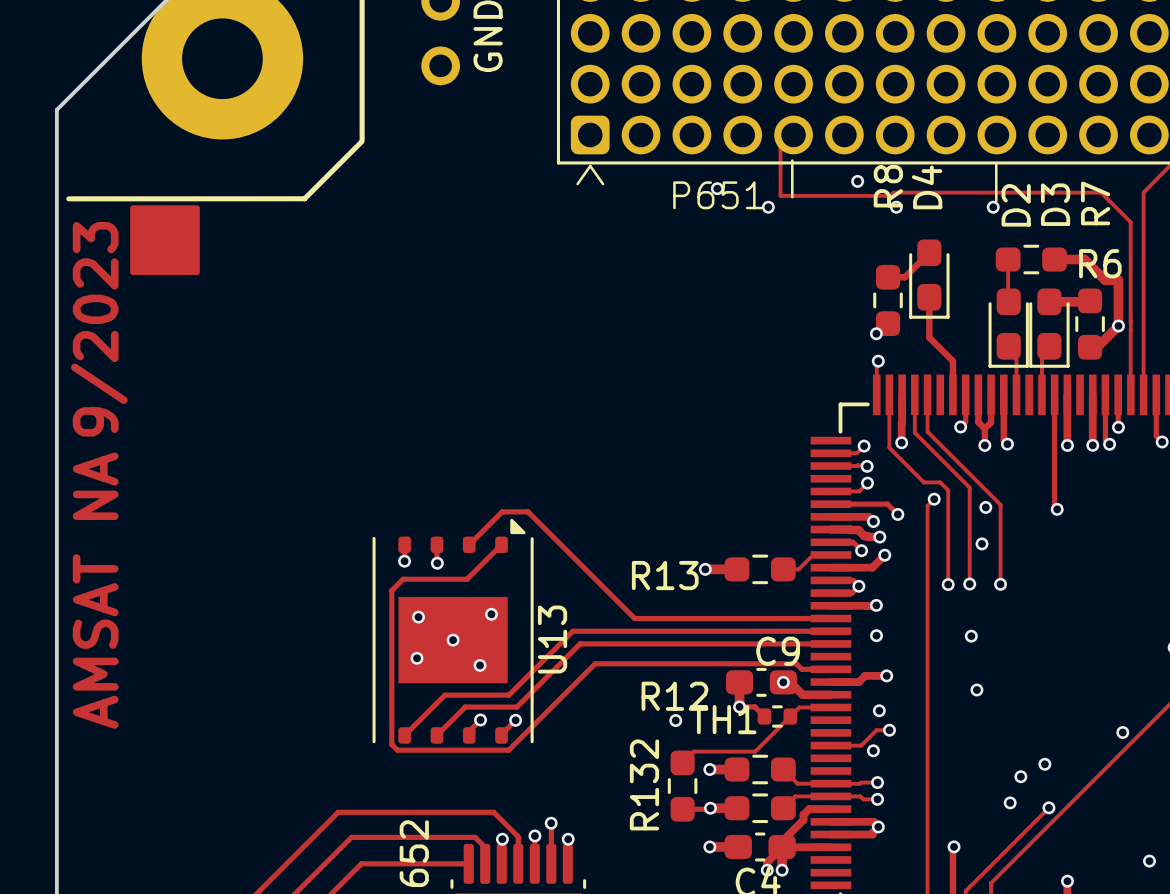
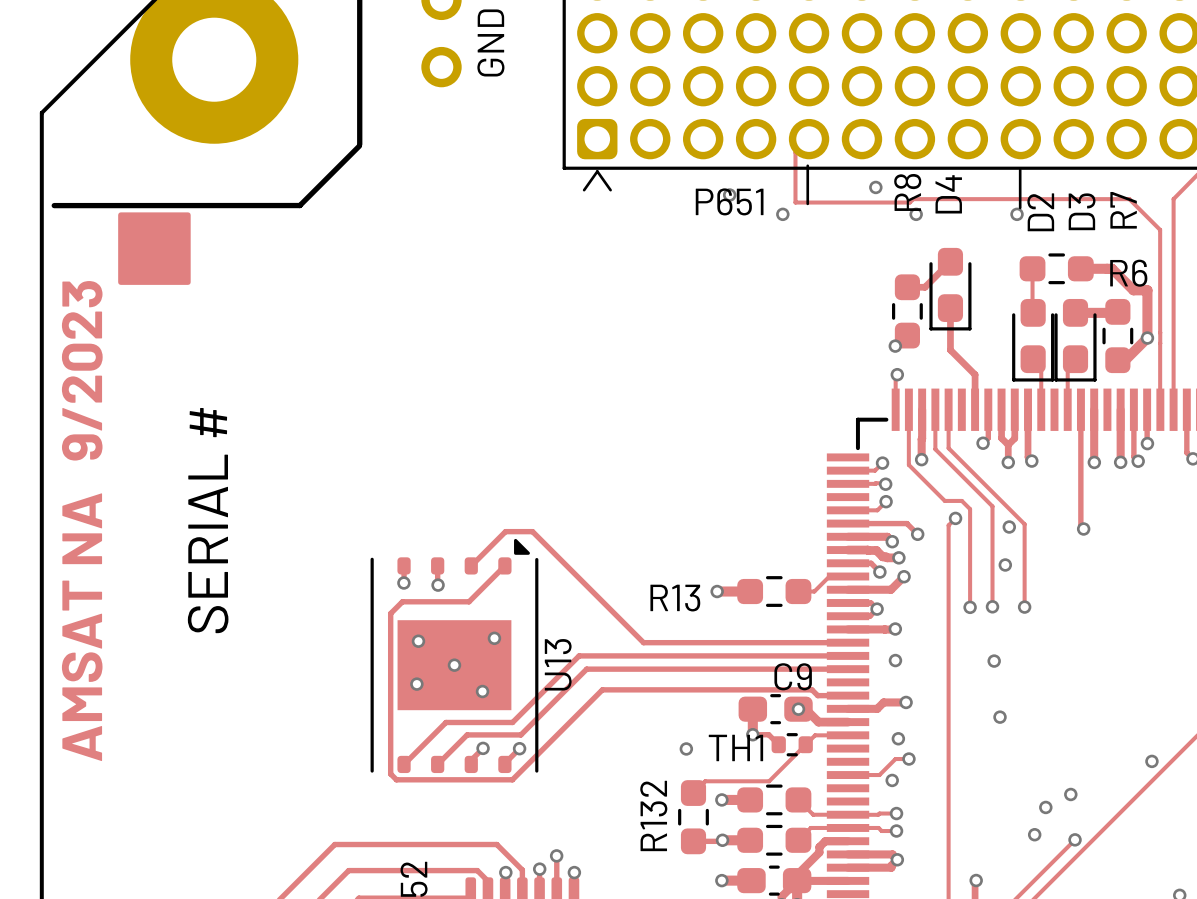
text: none -> SERIAL # (208, 520)
R12 name: R12 (674, 696) -> none

